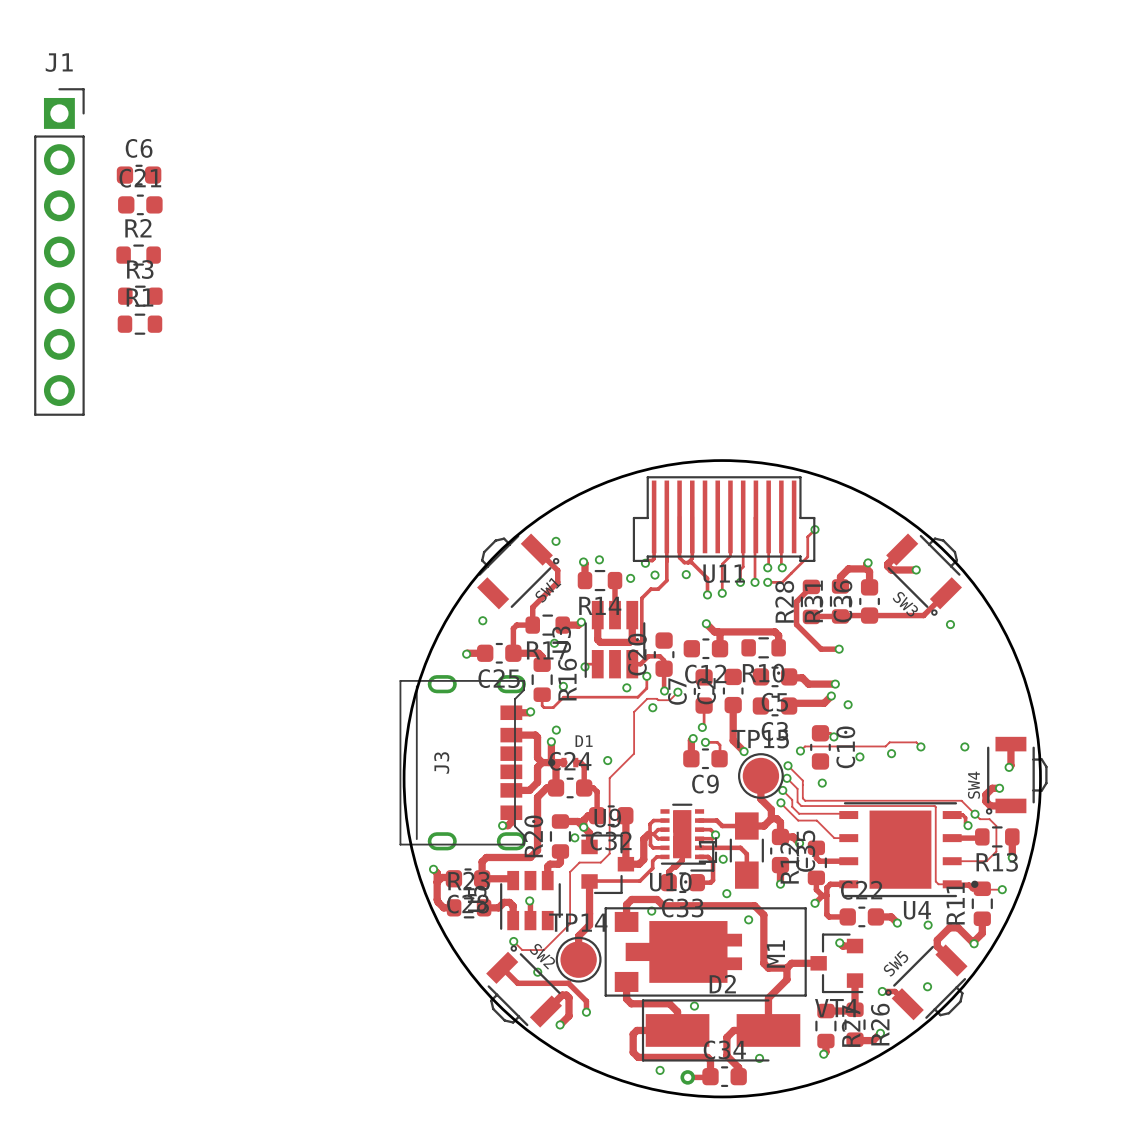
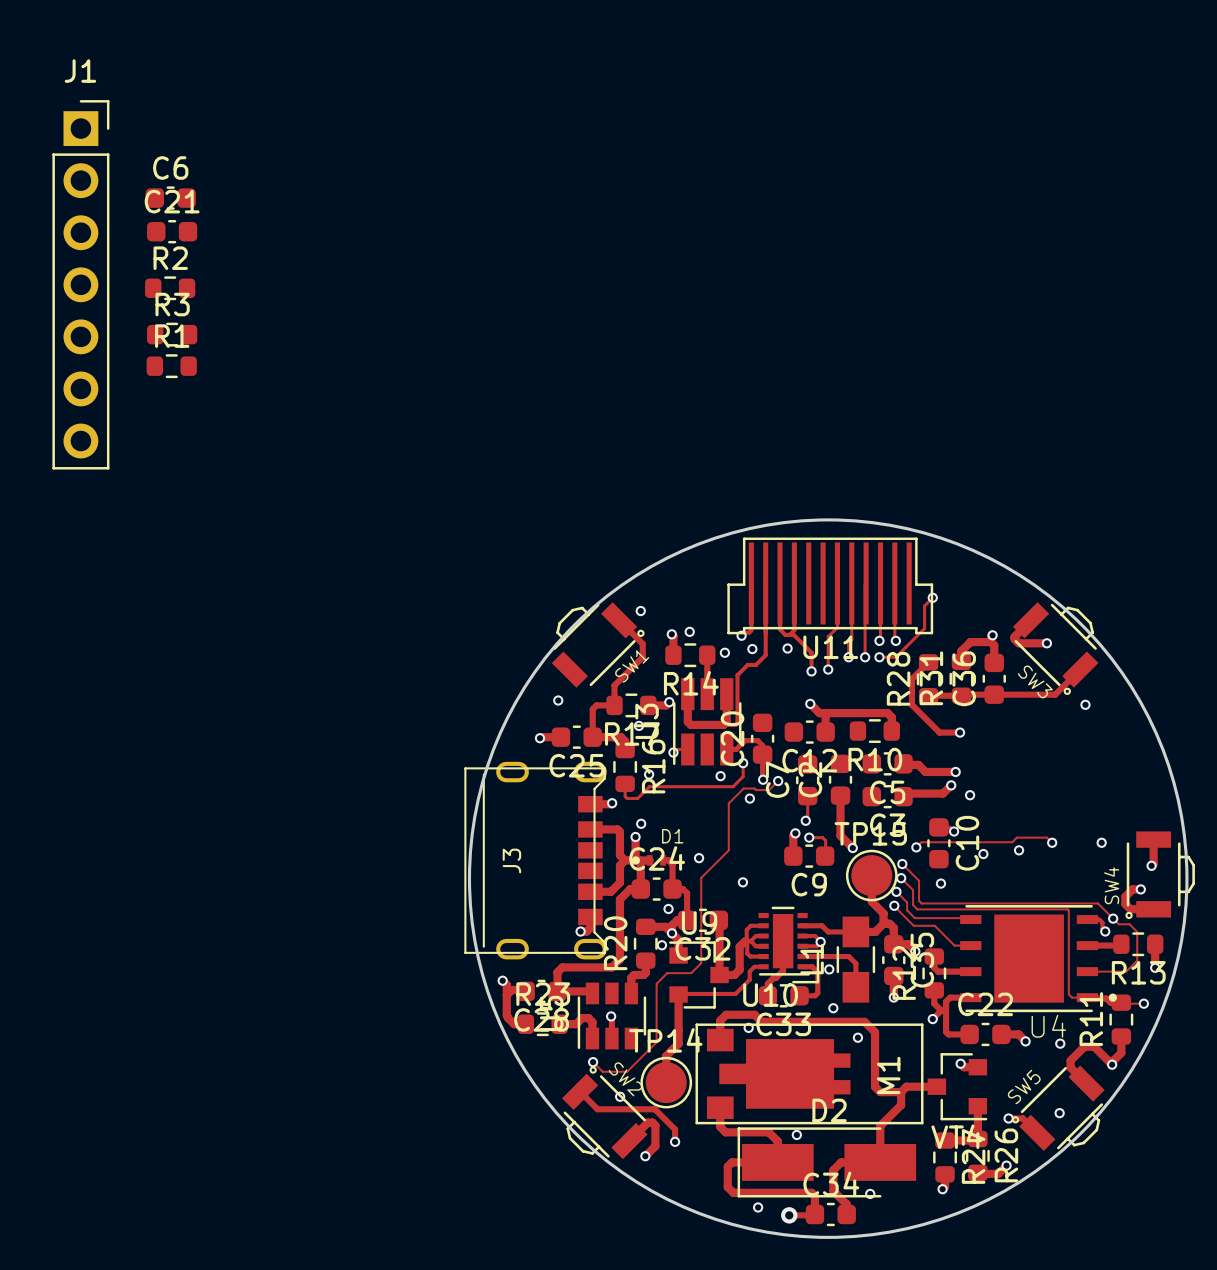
via: none -> (742, 882)
via: none -> (668, 908)

